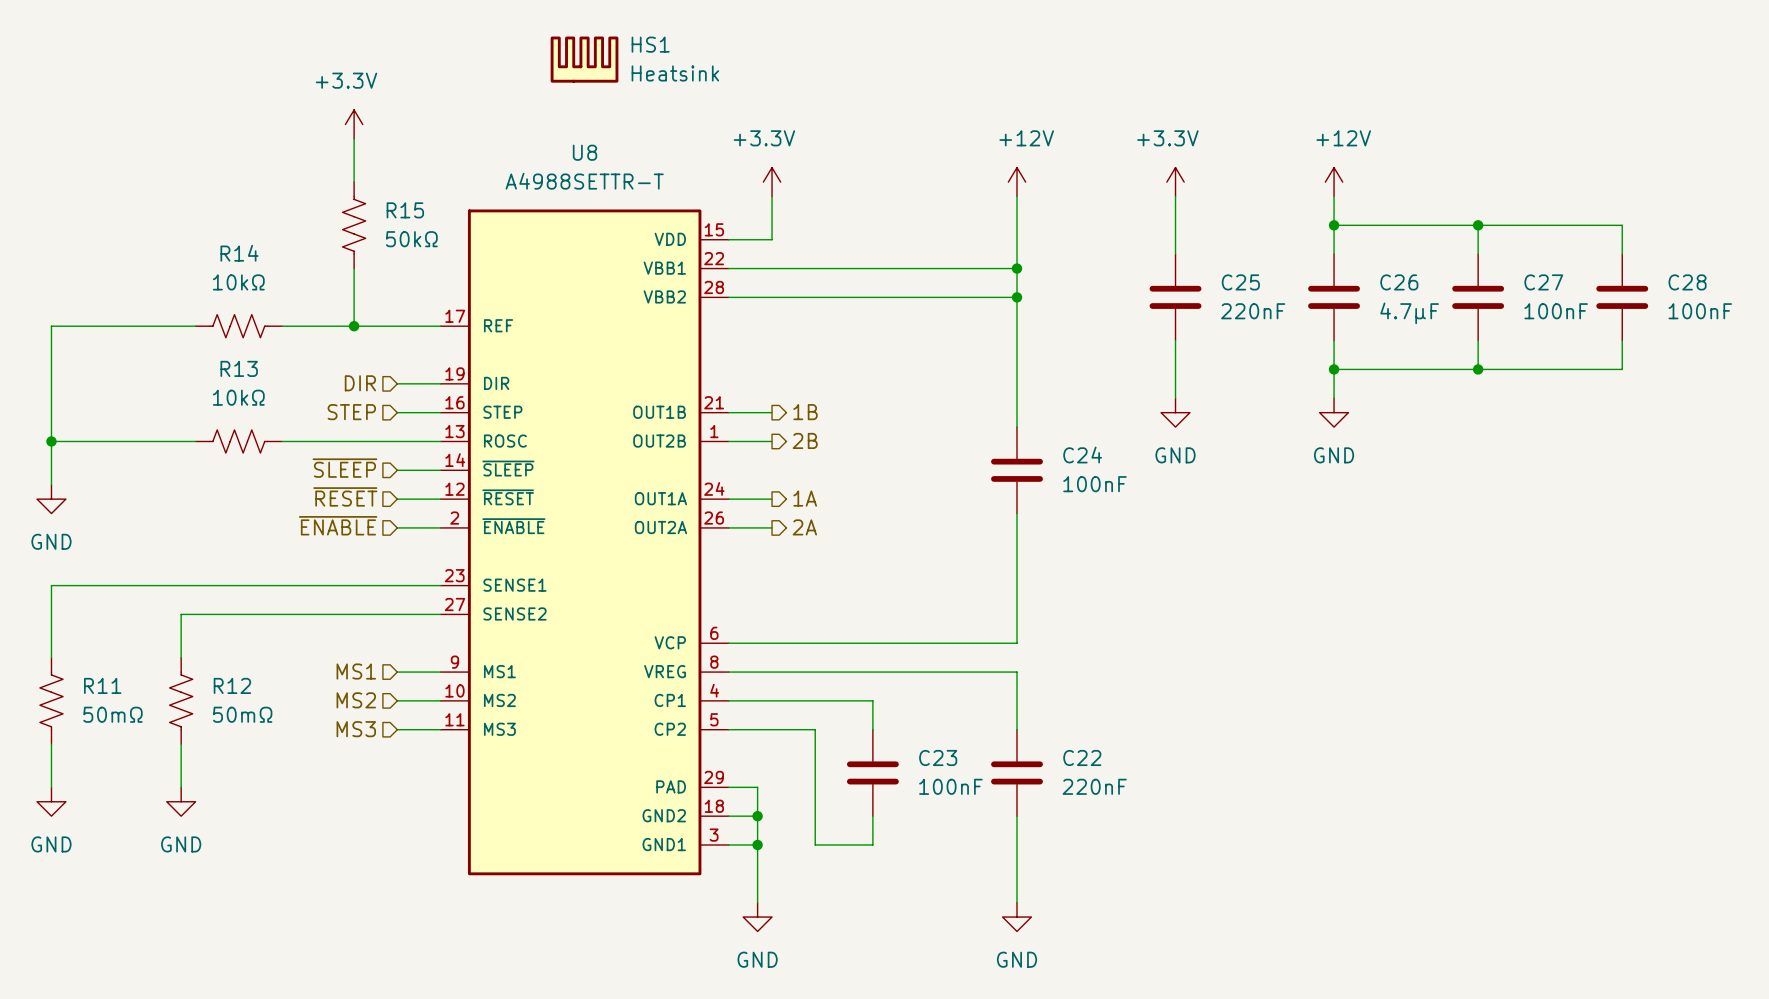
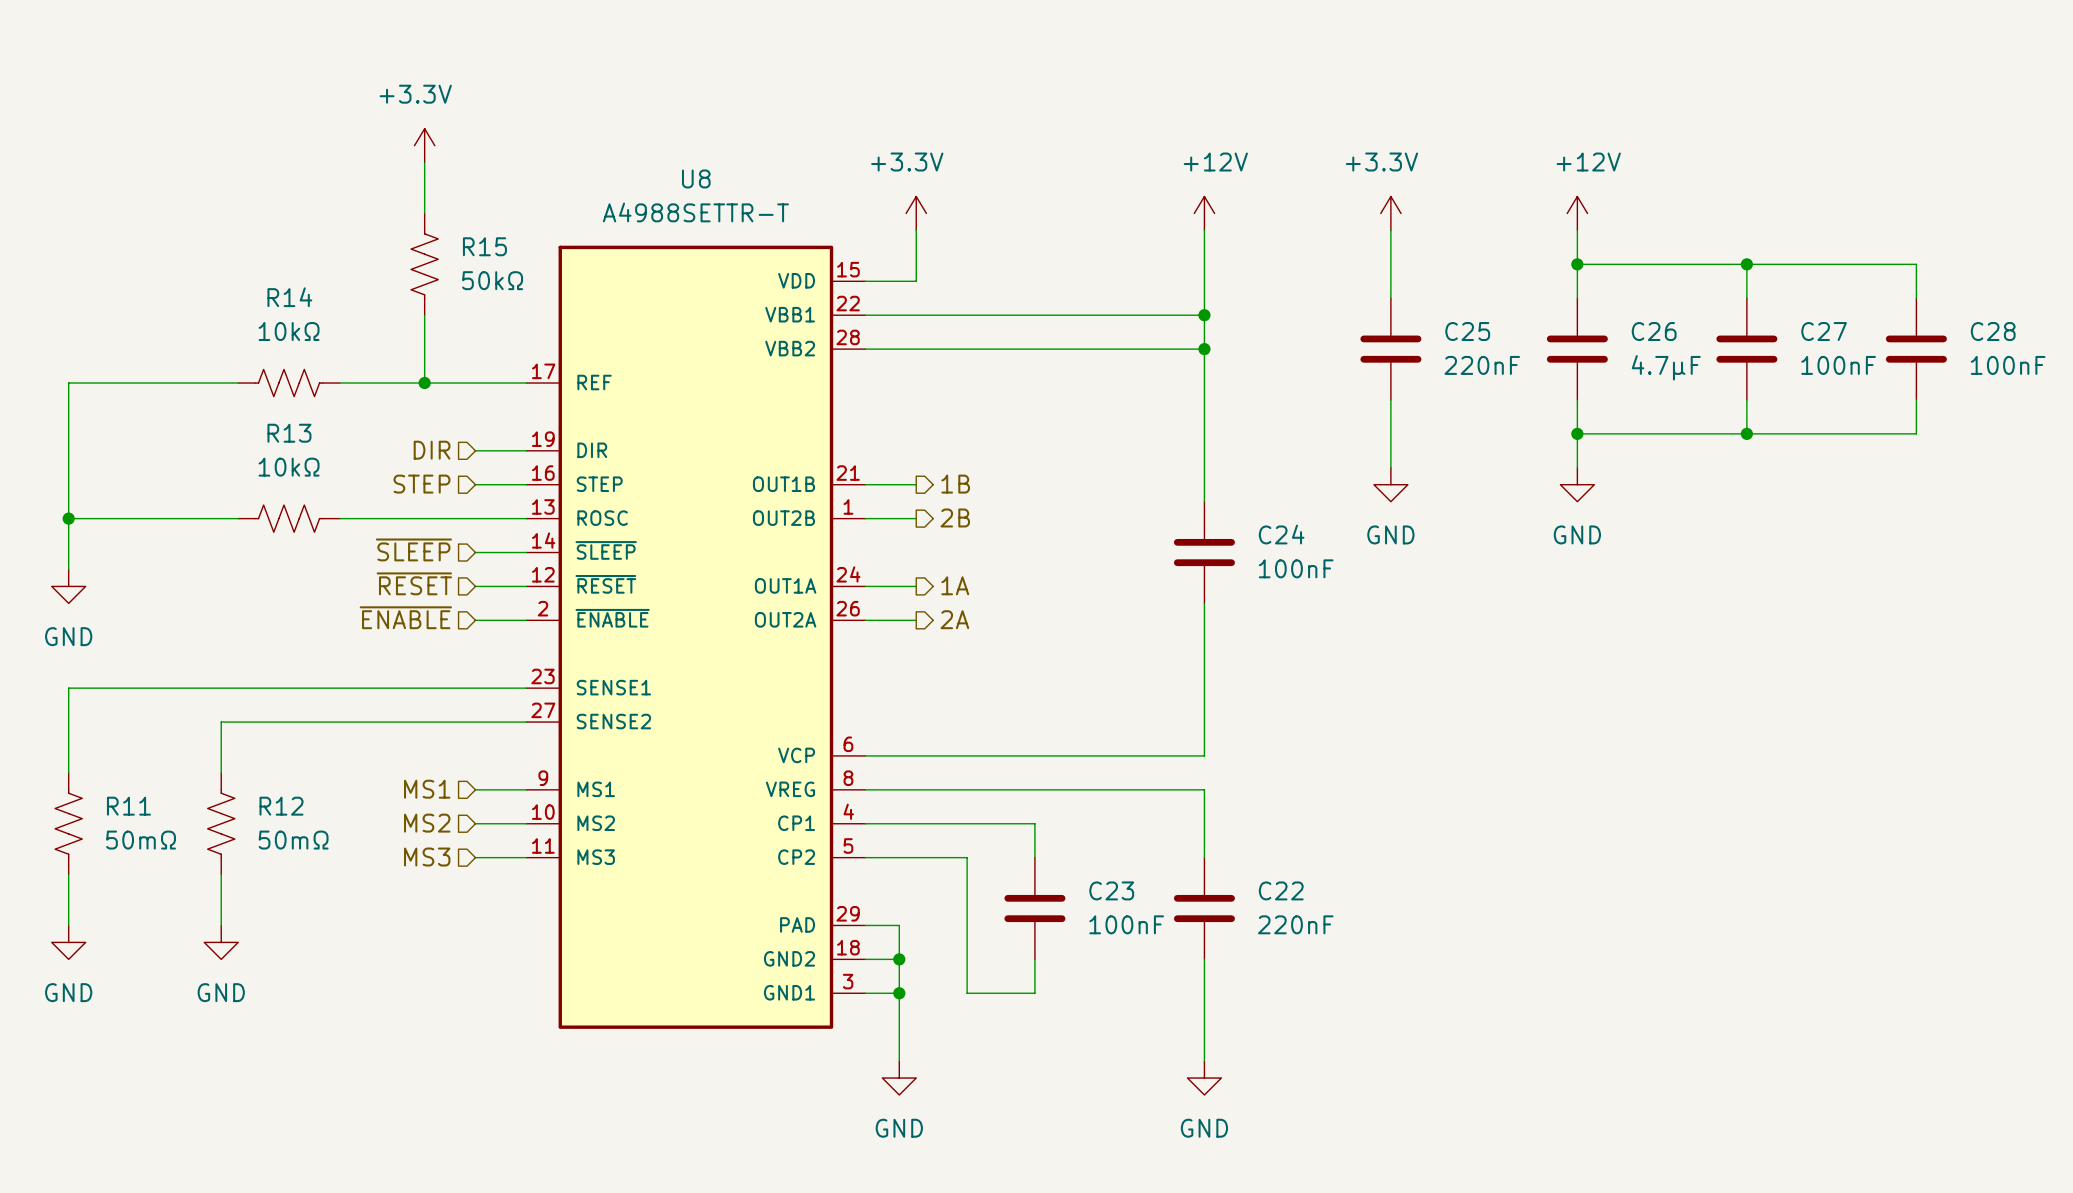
HS1: Heatsink (584, 59) -> none

